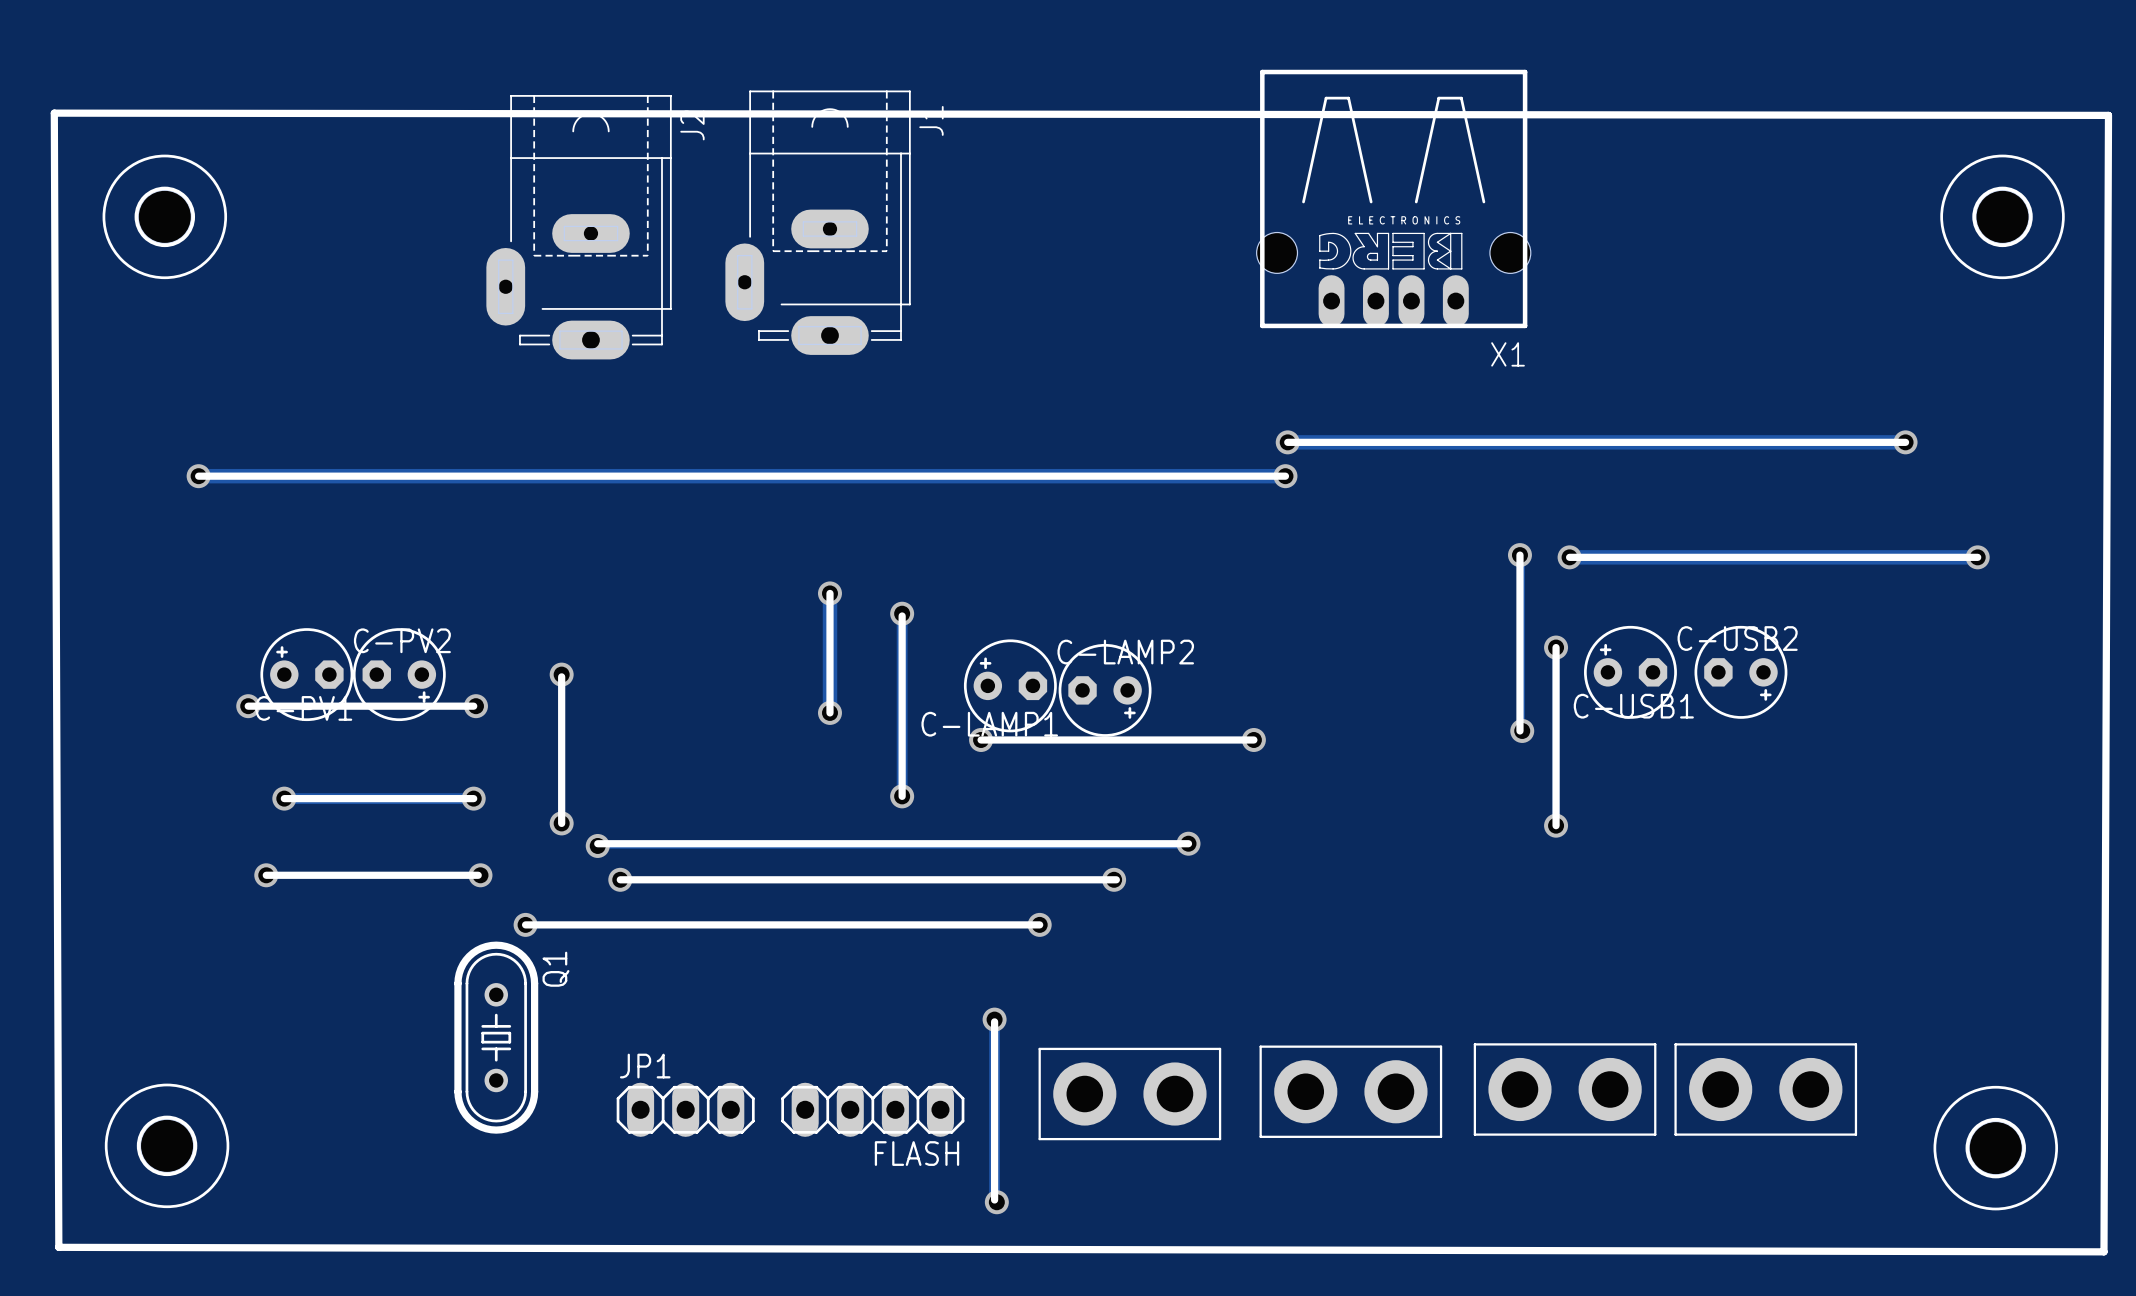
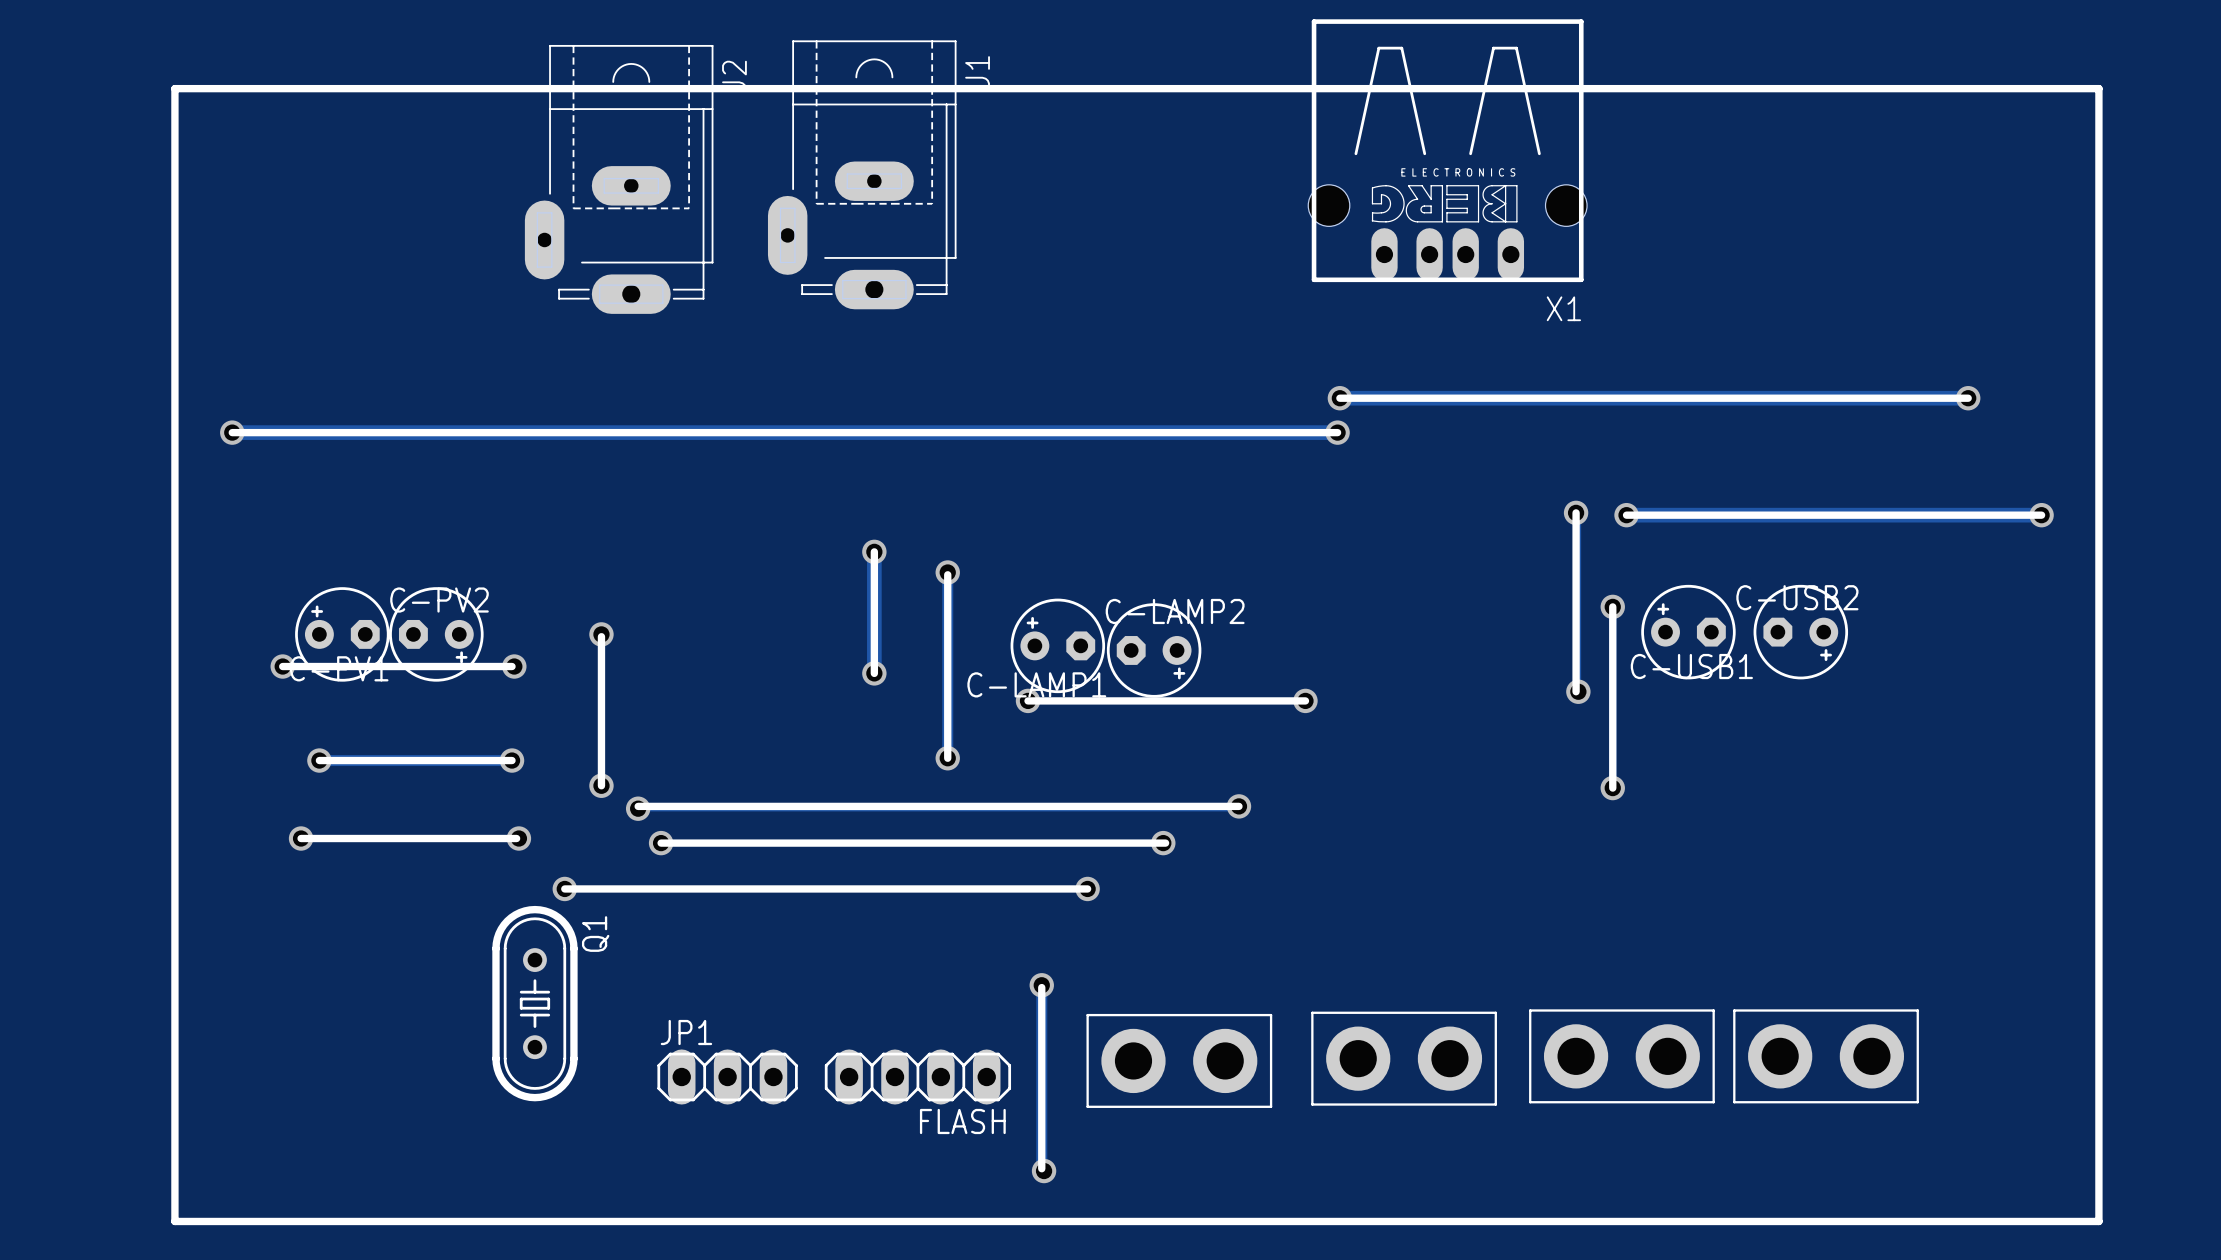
line: (54, 113) (2108, 115) (2103, 1251) (58, 1247) (54, 113) -> (174, 88) (174, 1221) (2098, 1221) (2098, 88) (174, 88)
part: (164, 216) -> none
part: (2002, 216) -> none
part: (167, 1145) -> none
part: (1995, 1148) -> none

